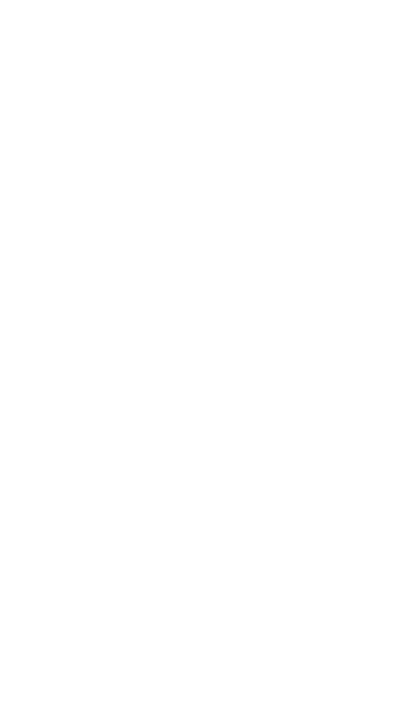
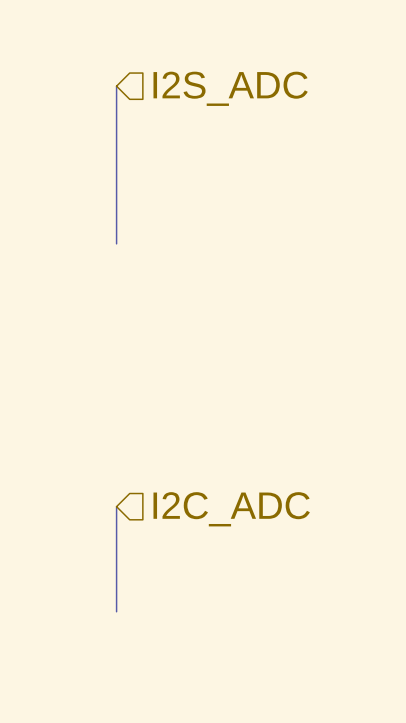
bus: none -> (116, 86) (116, 243)
hierarchical label: none -> I2S_ADC (230, 88)
bus: none -> (116, 506) (116, 611)
hierarchical label: none -> I2C_ADC (231, 509)

